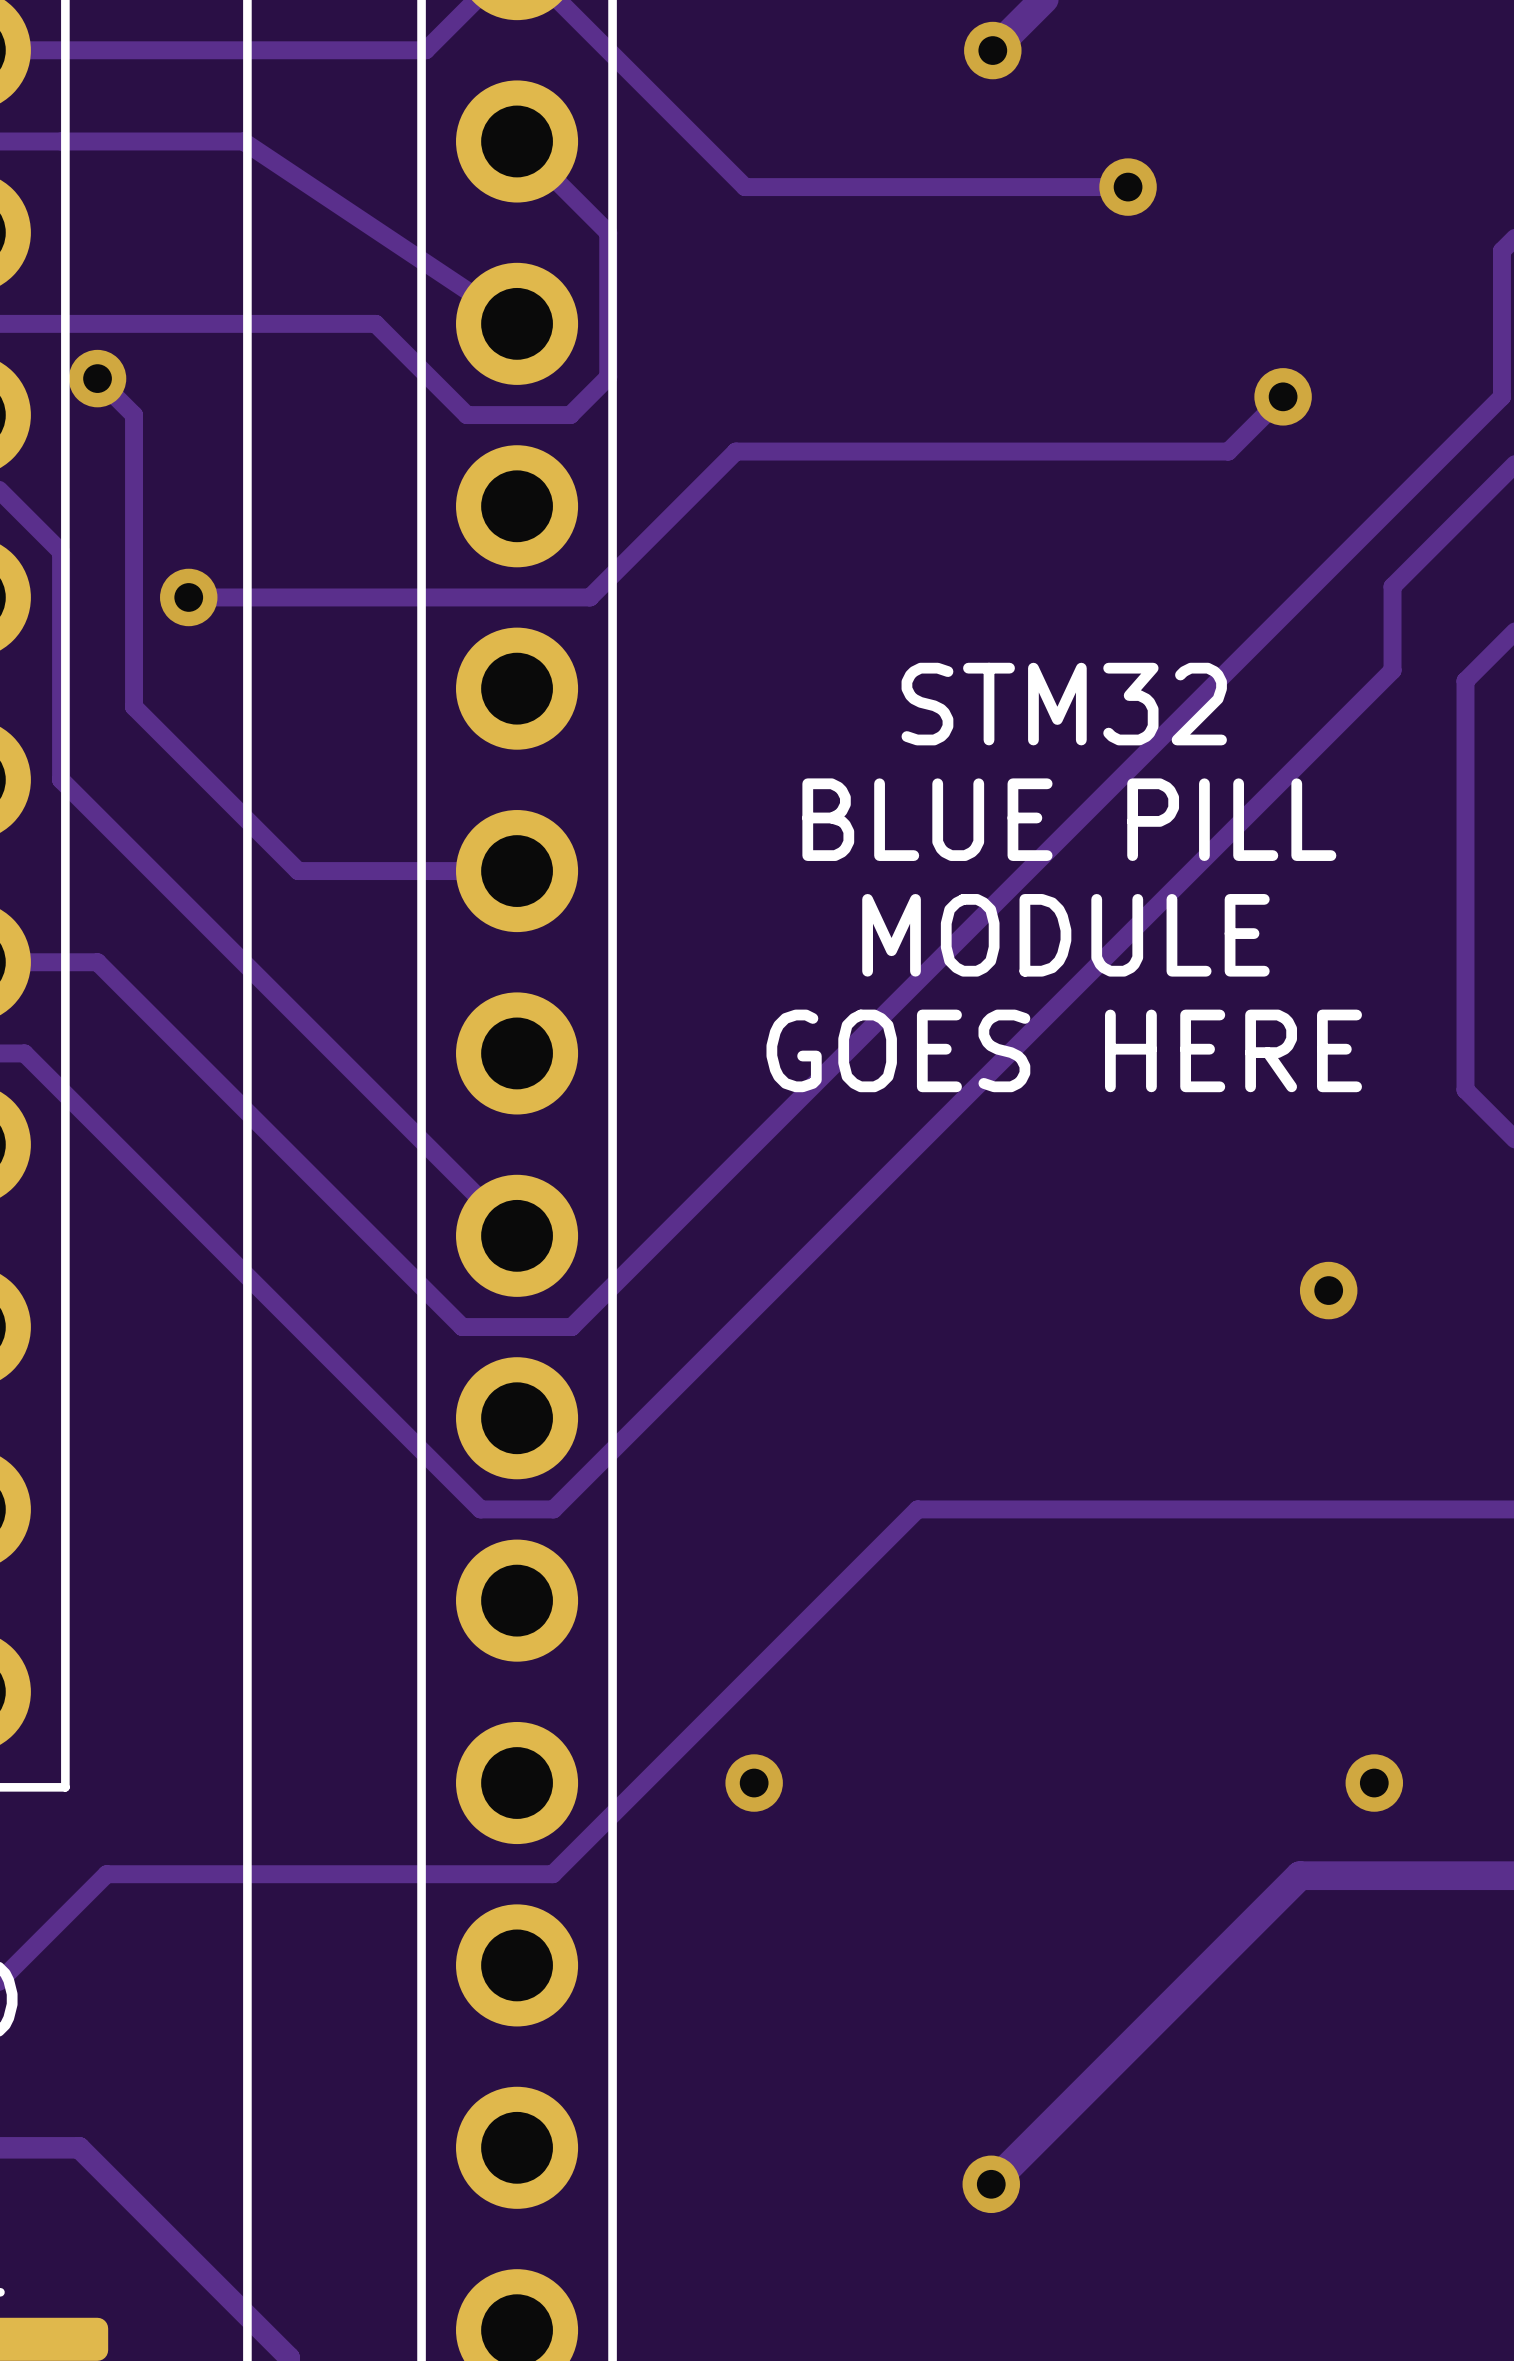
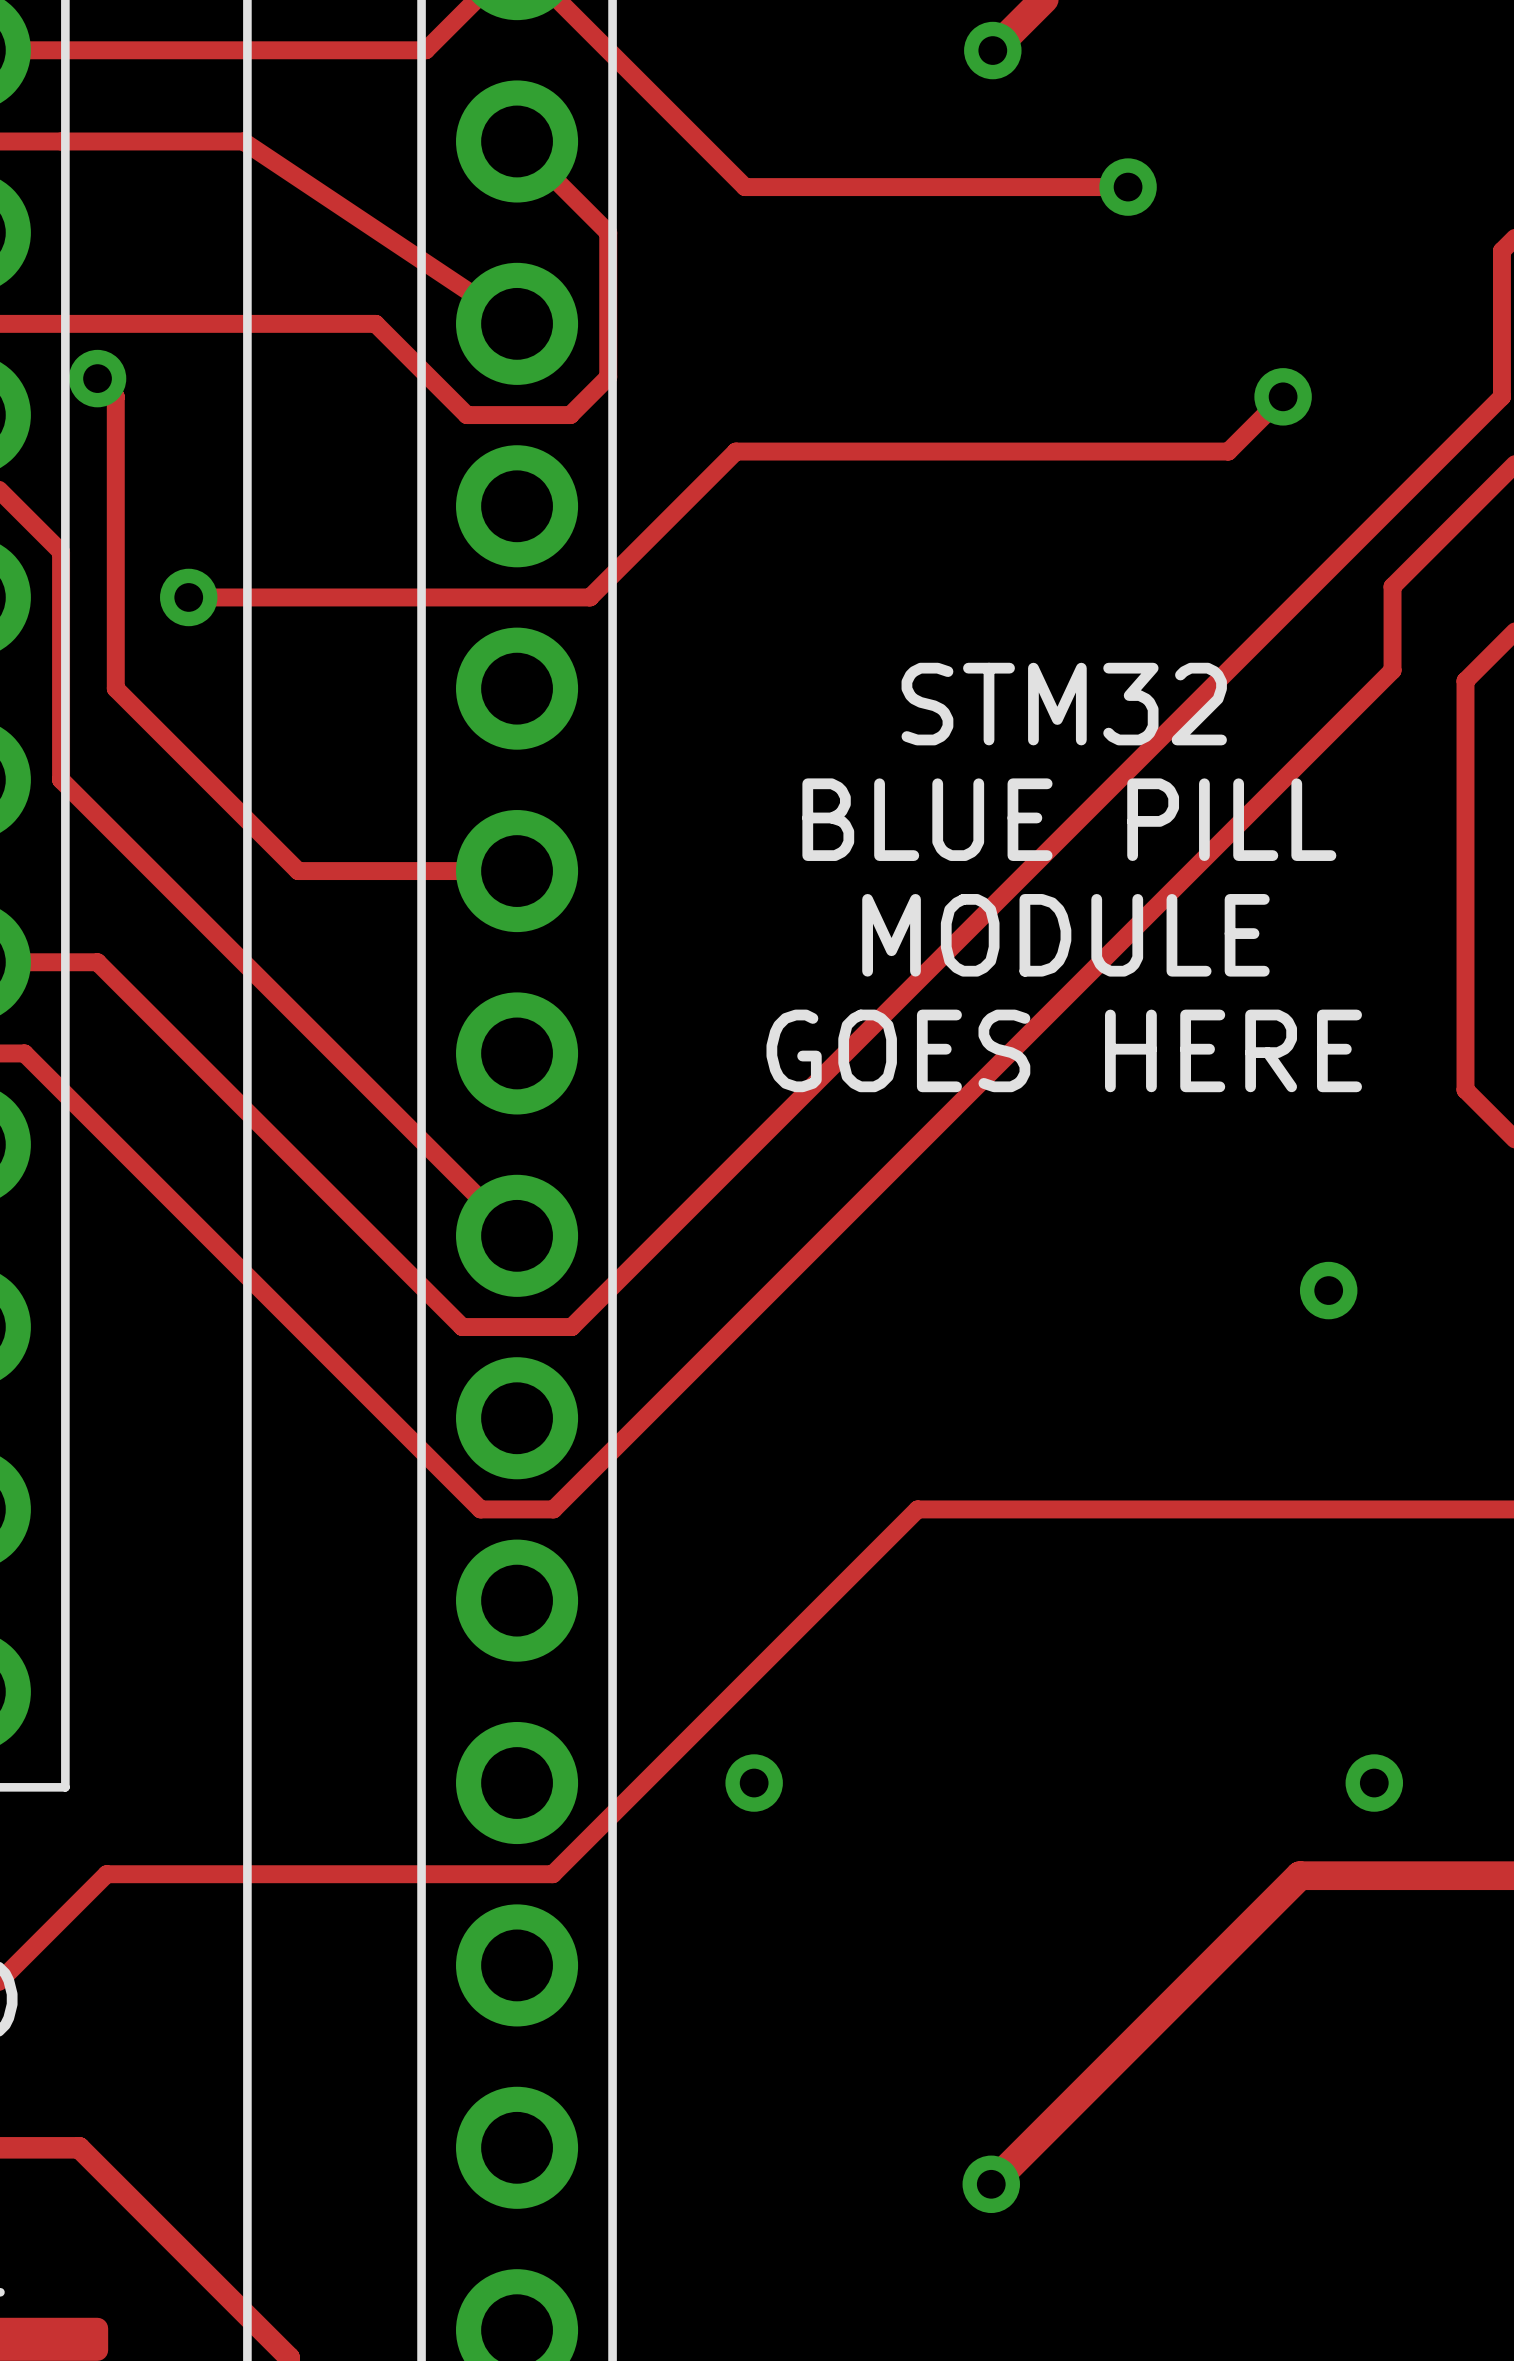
track: (115, 396) (134, 415) (134, 706) -> (115, 396) (115, 688) (134, 706)

